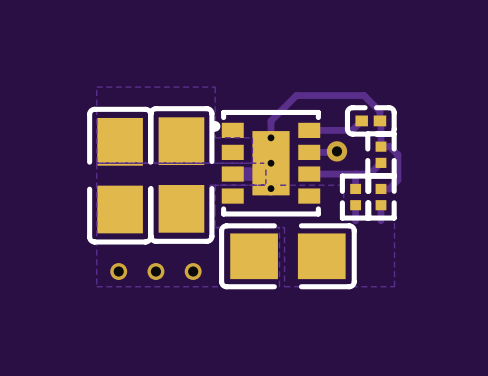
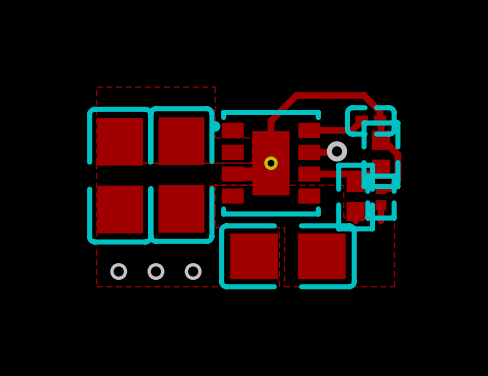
part footprint: [209, 109, 321, 217] -> [209, 109, 321, 217]
part footprint: [365, 131, 397, 179] -> [361, 120, 401, 190]
part footprint: [339, 173, 372, 221] -> [336, 162, 376, 232]

